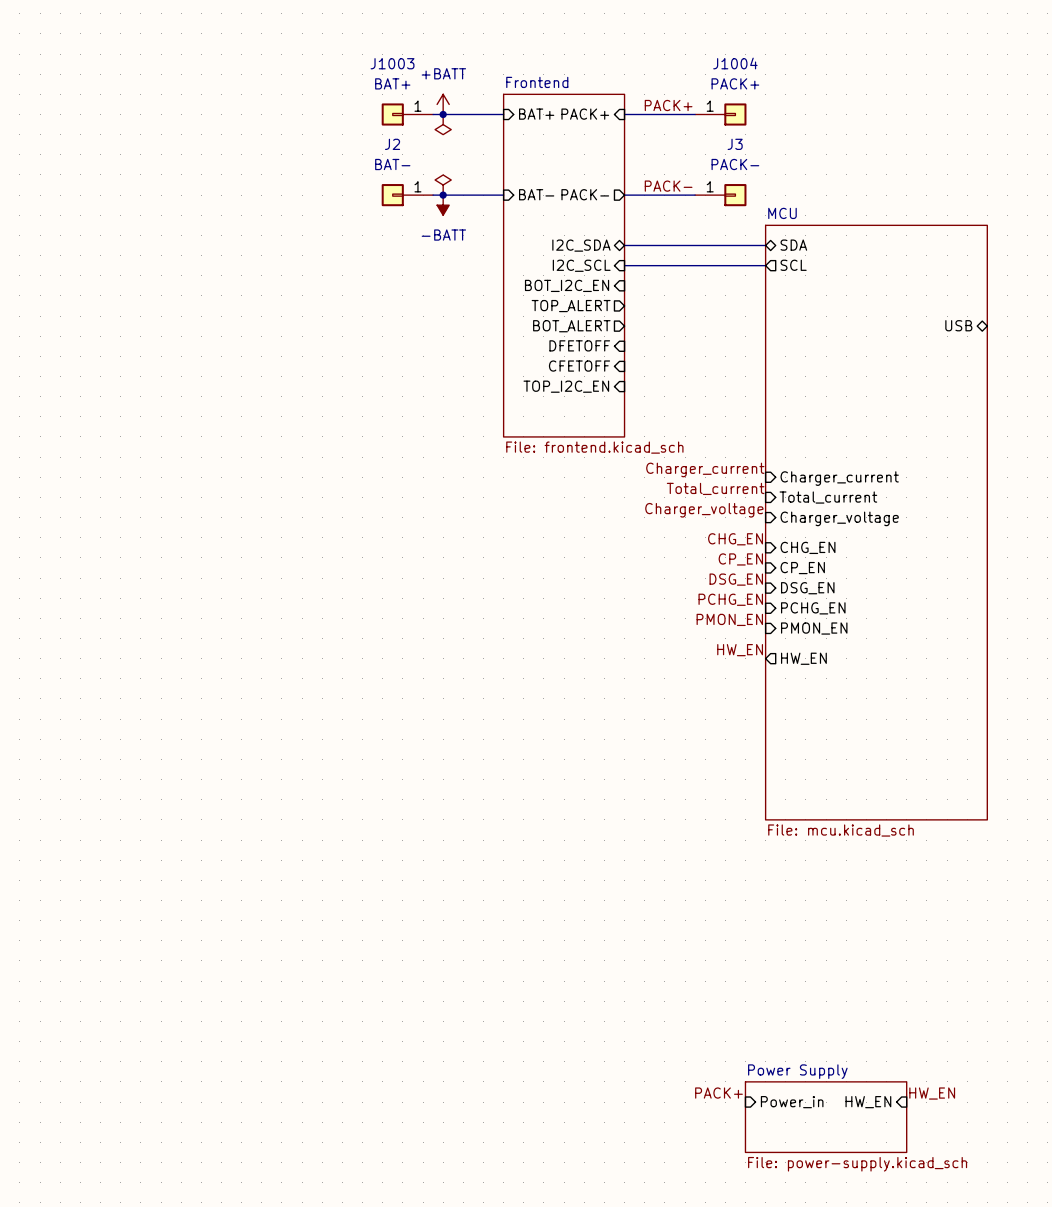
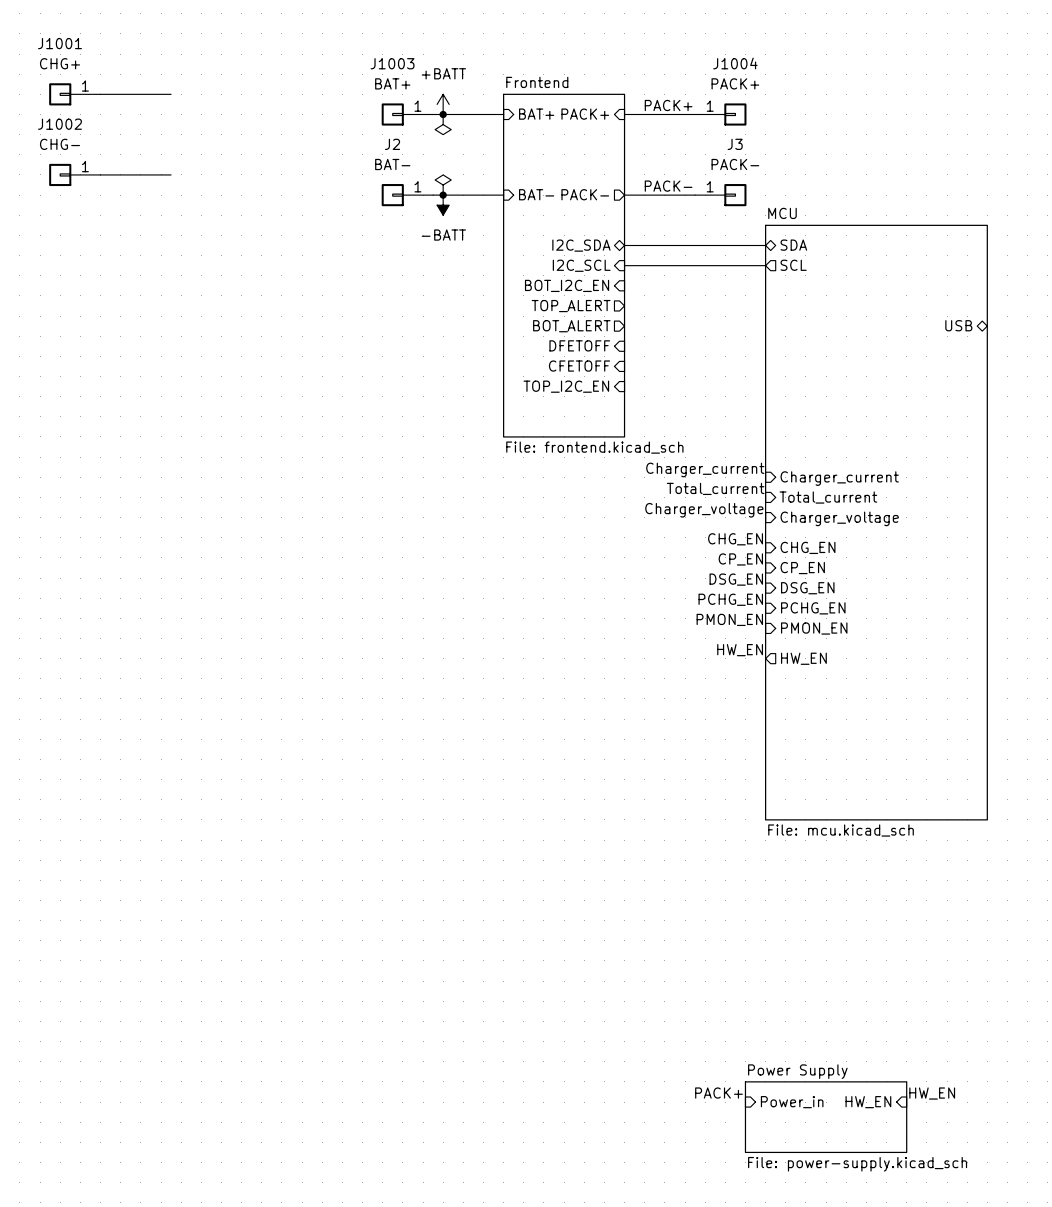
J1001: none -> CHG+ (74, 94)
wire: none -> (100, 94) (171, 94)
J1002: none -> CHG- (74, 174)
wire: none -> (100, 174) (171, 174)

